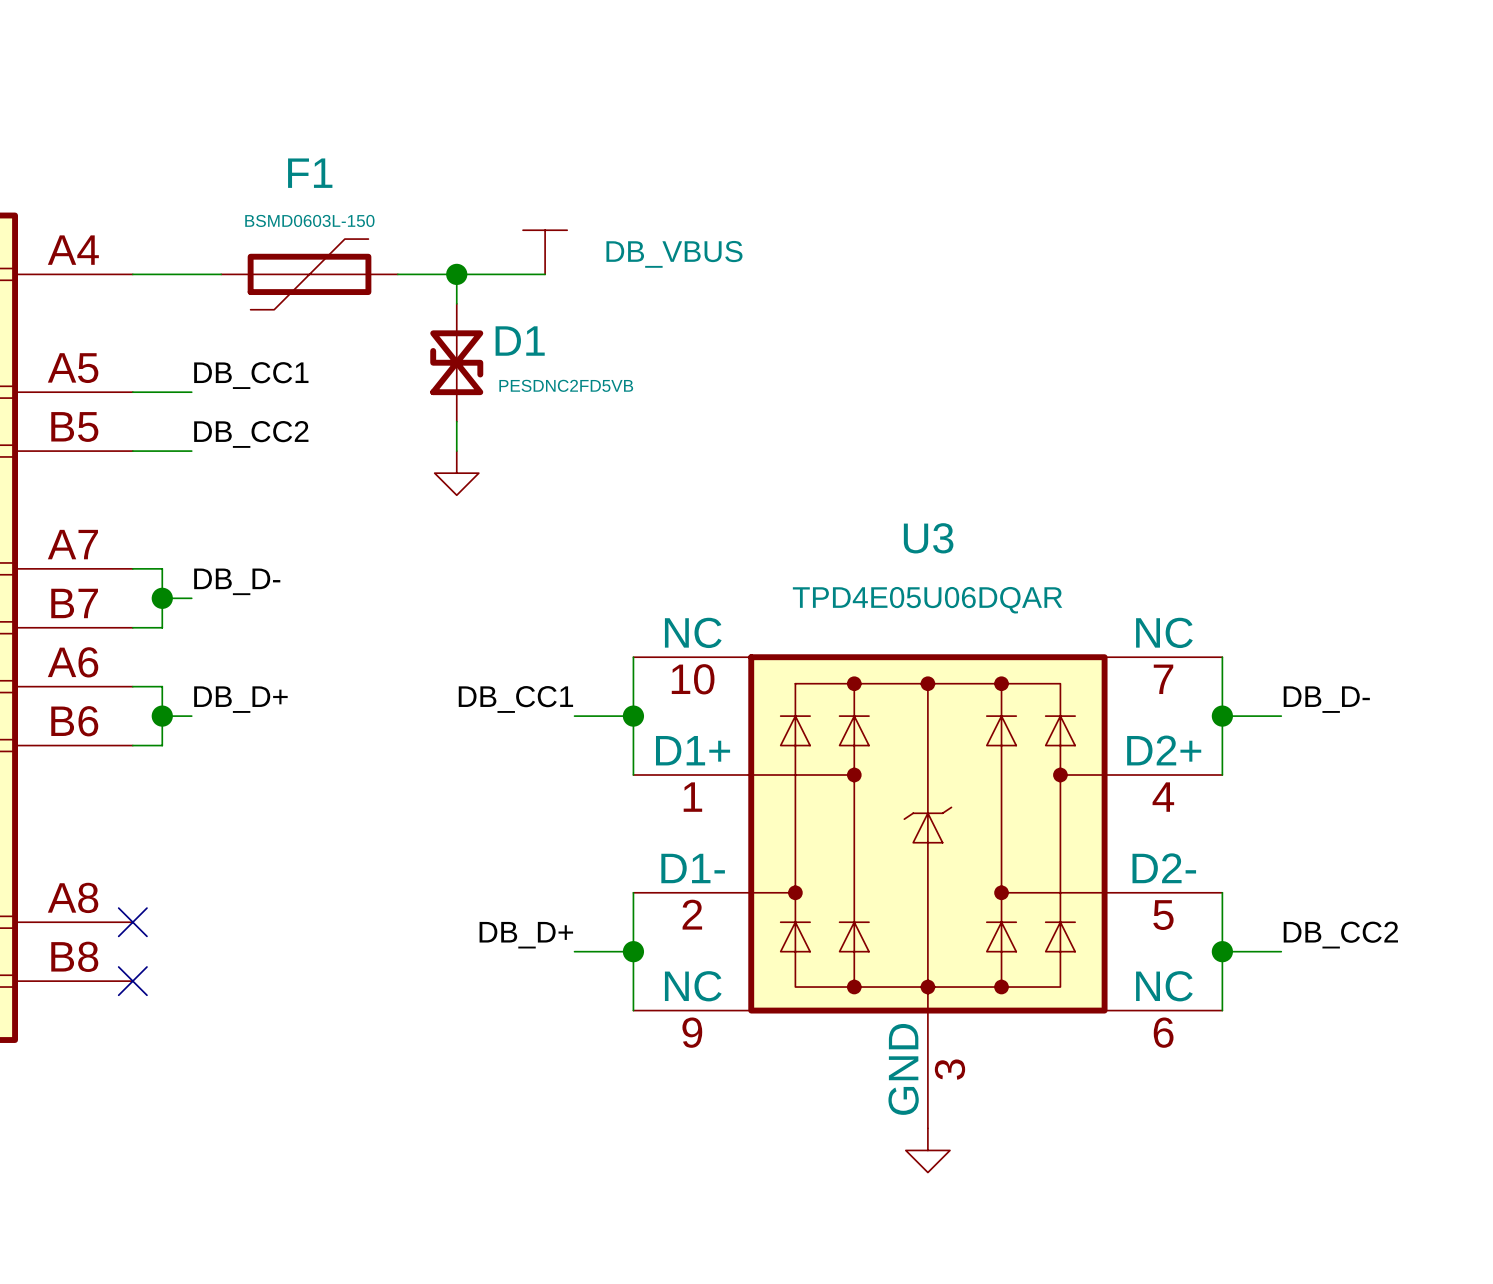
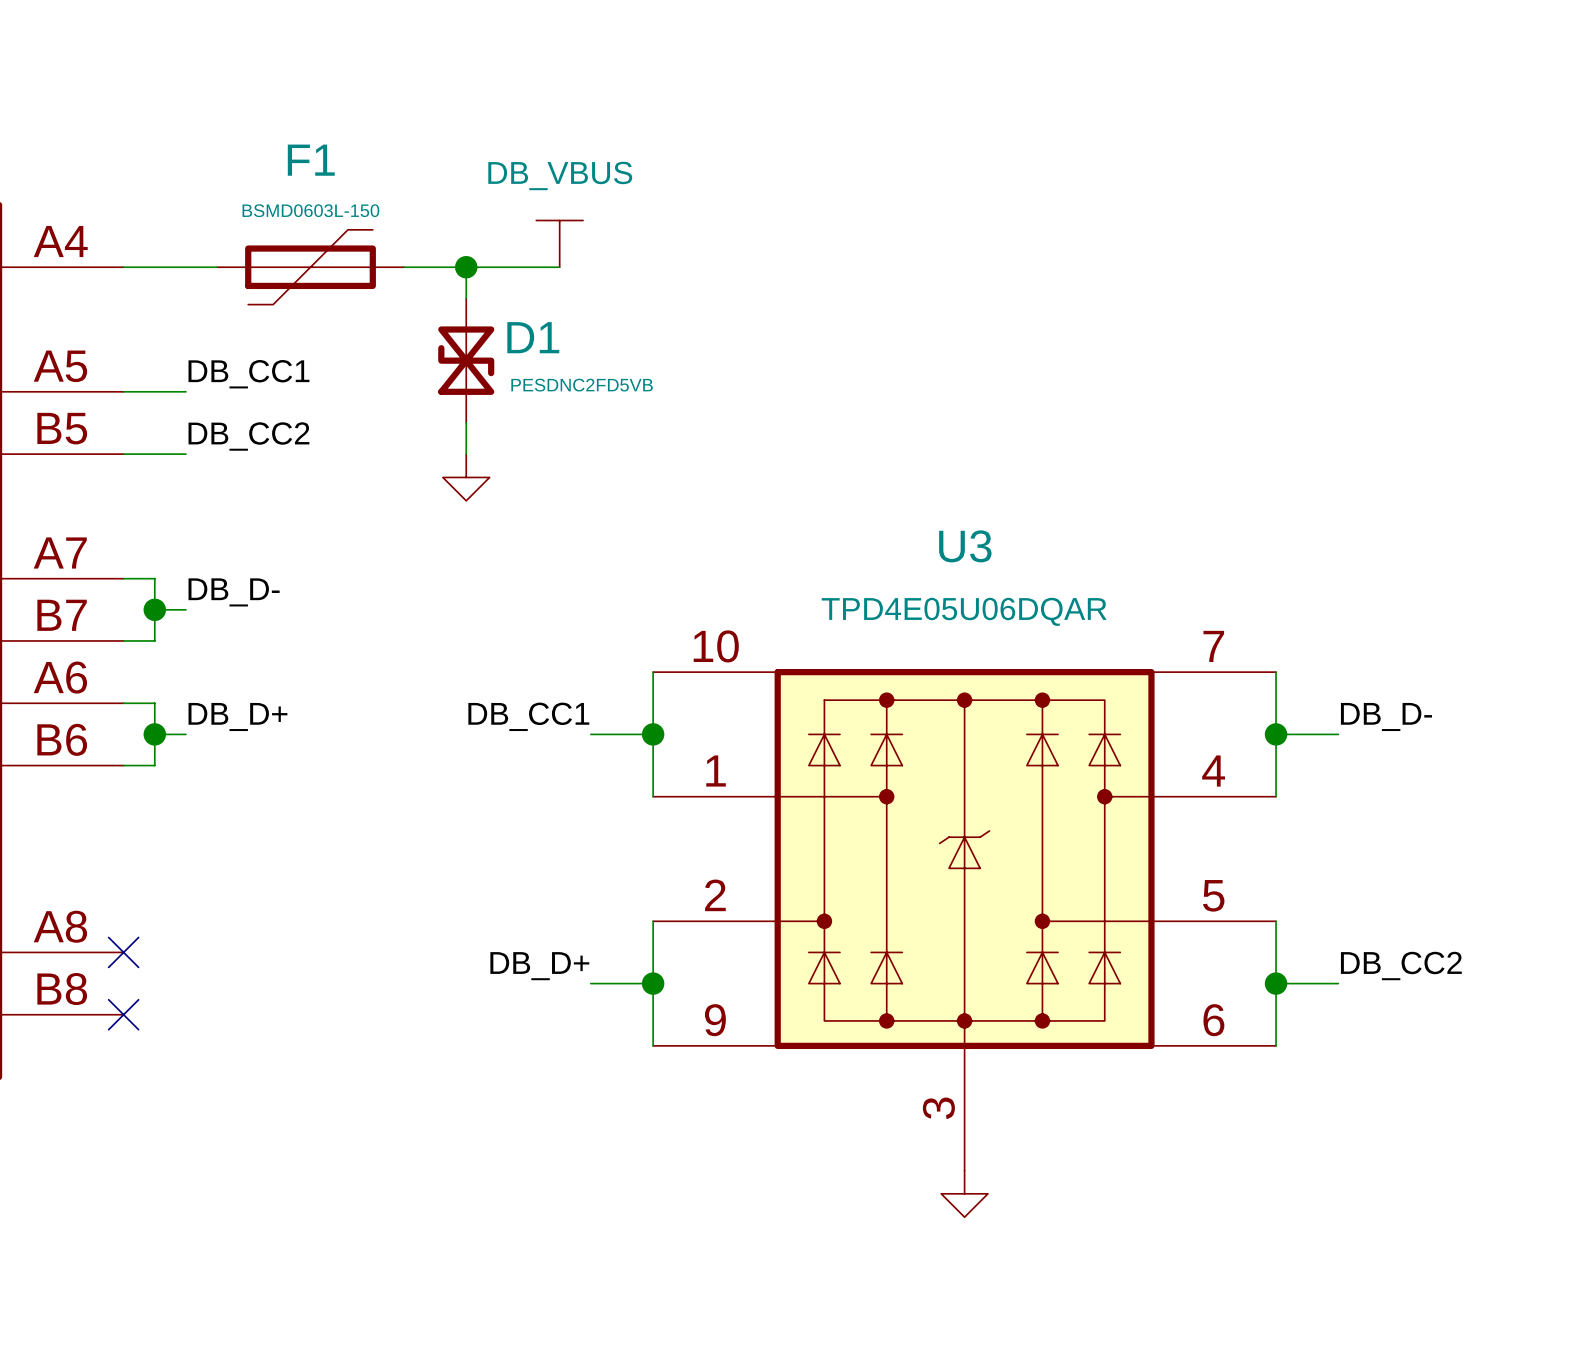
power symbol text position: DB_VBUS (674, 254) -> DB_VBUS (560, 175)
U3 symbol: [633, 654, 1223, 1129] -> [653, 669, 1277, 1171]

